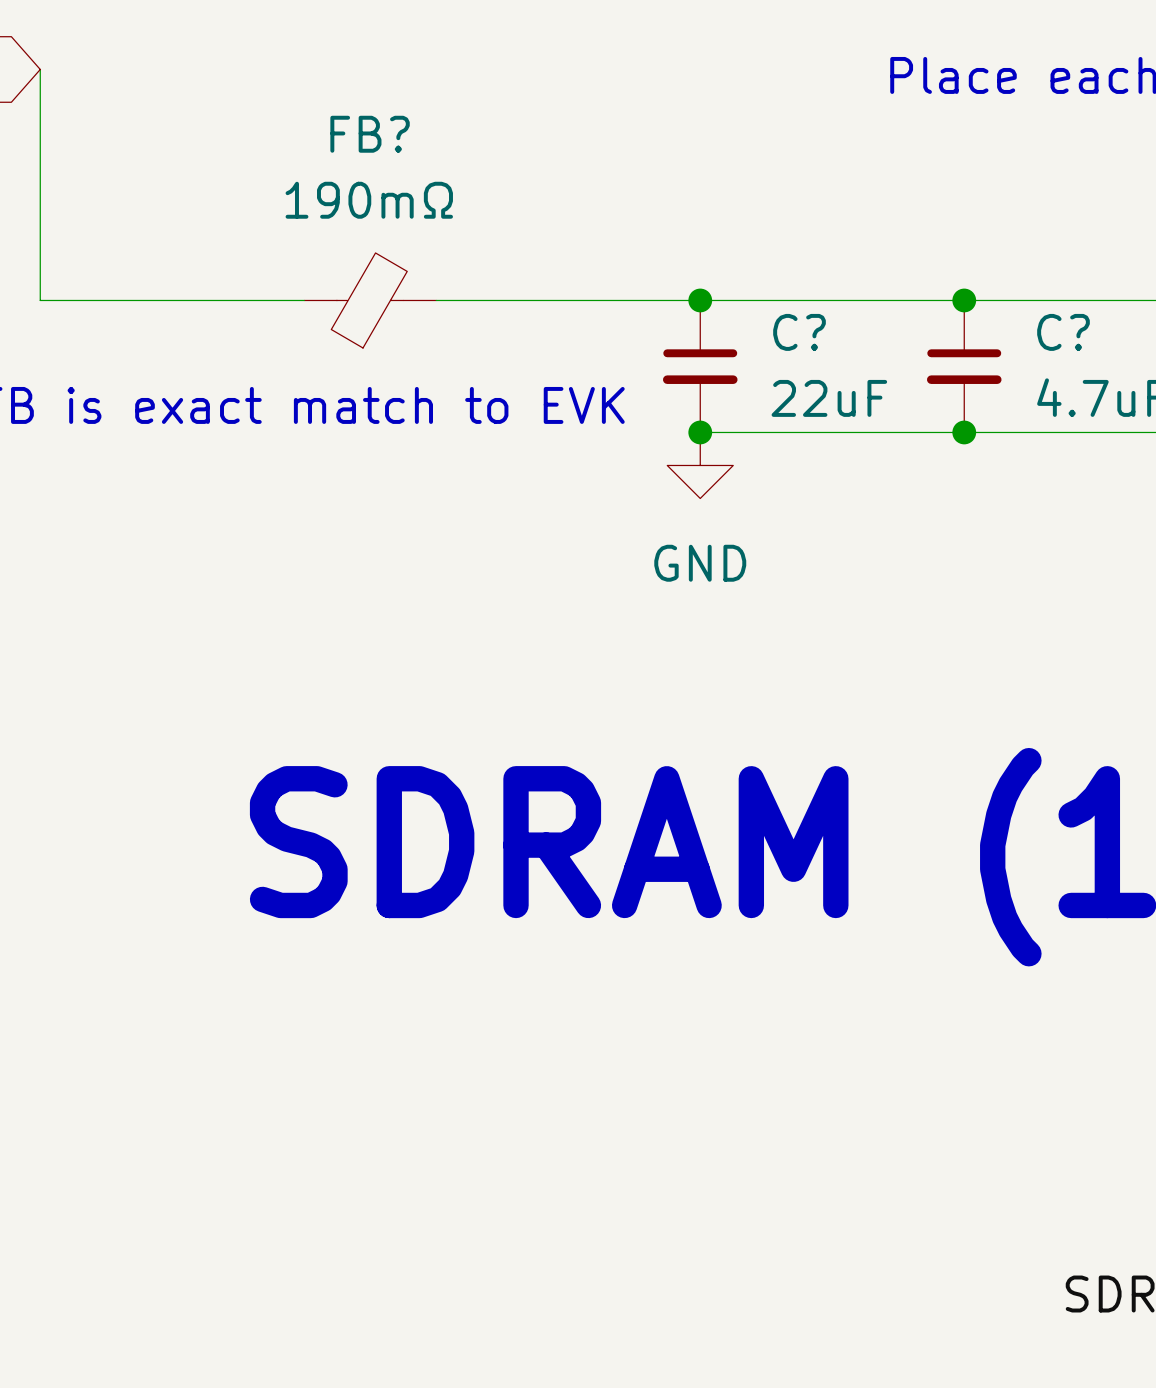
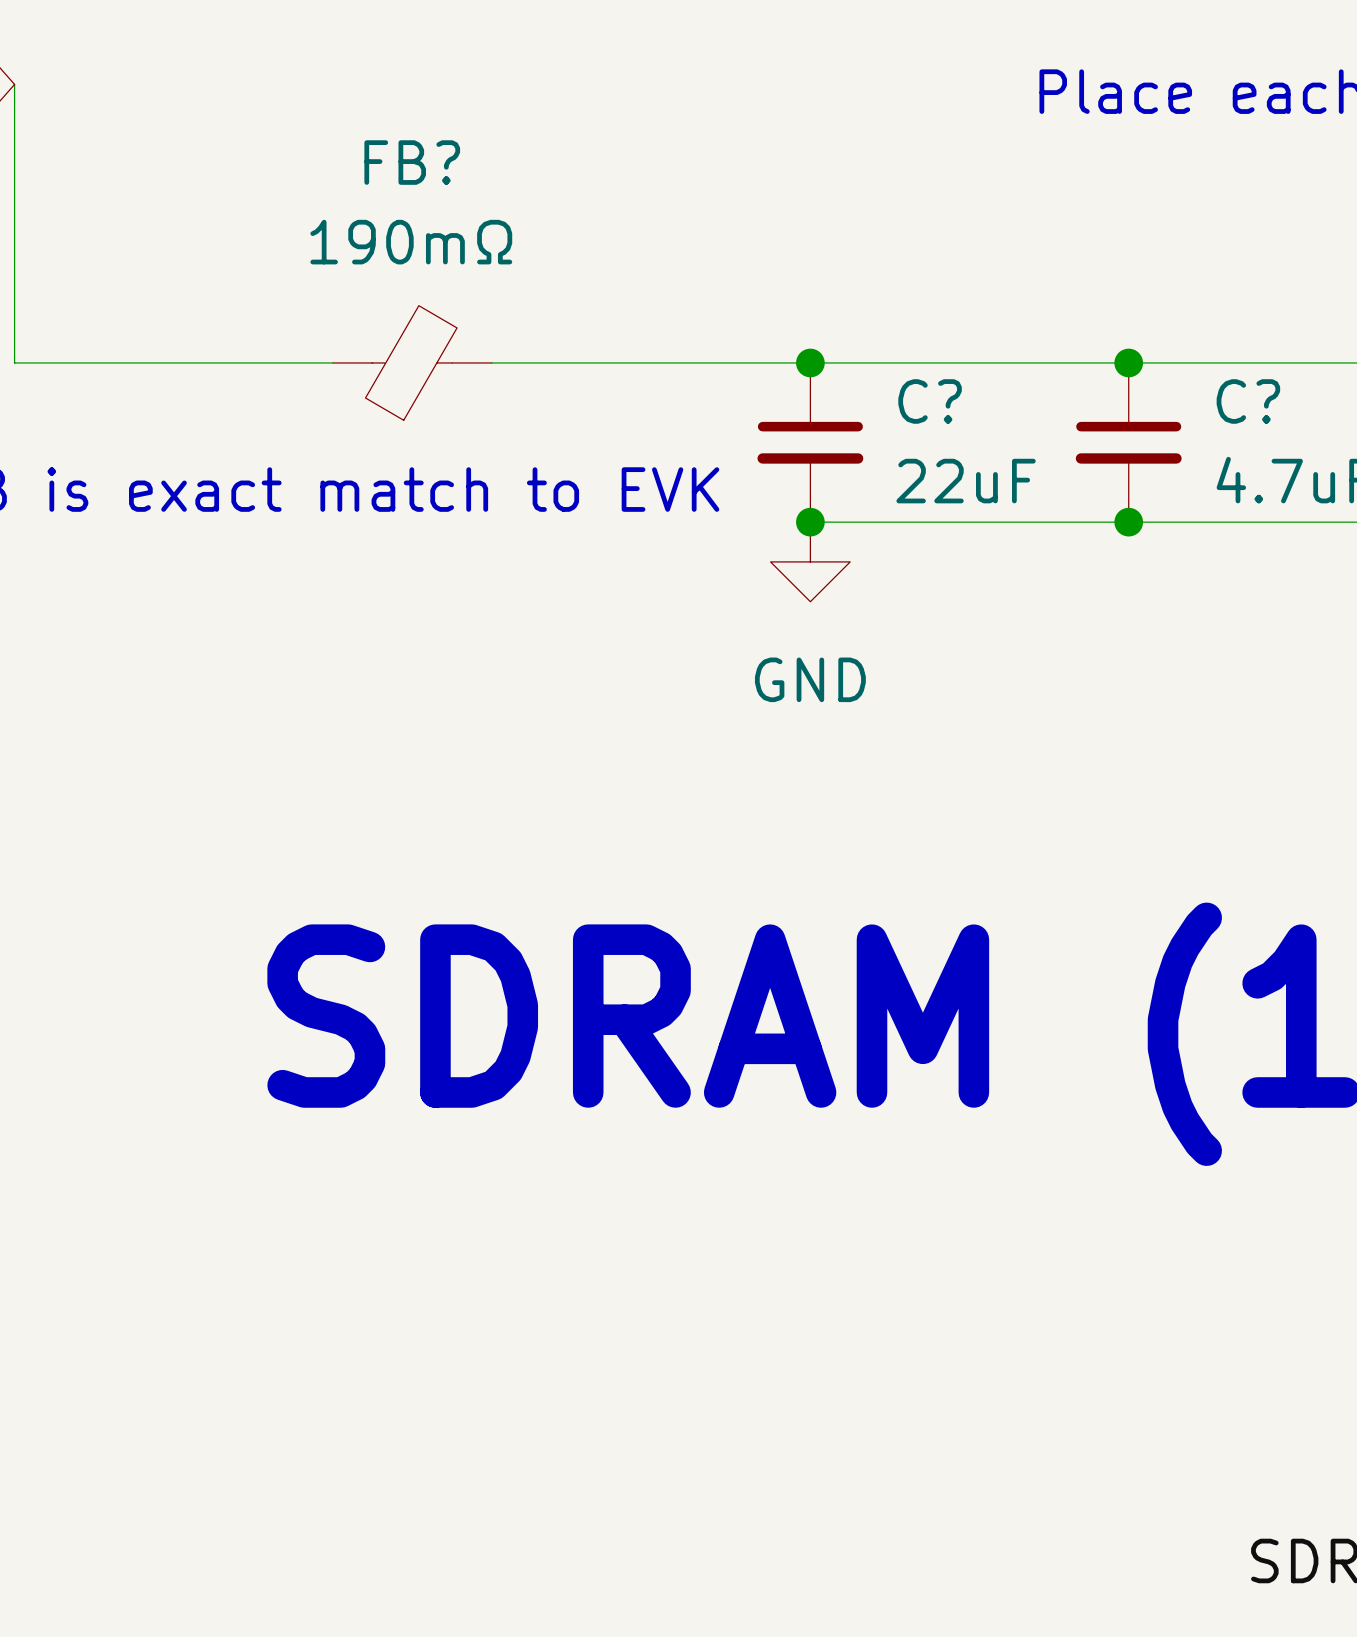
C? symbol: [662, 300, 738, 433] -> [757, 362, 864, 523]
C? symbol: [926, 300, 1002, 433] -> [1075, 362, 1182, 523]

